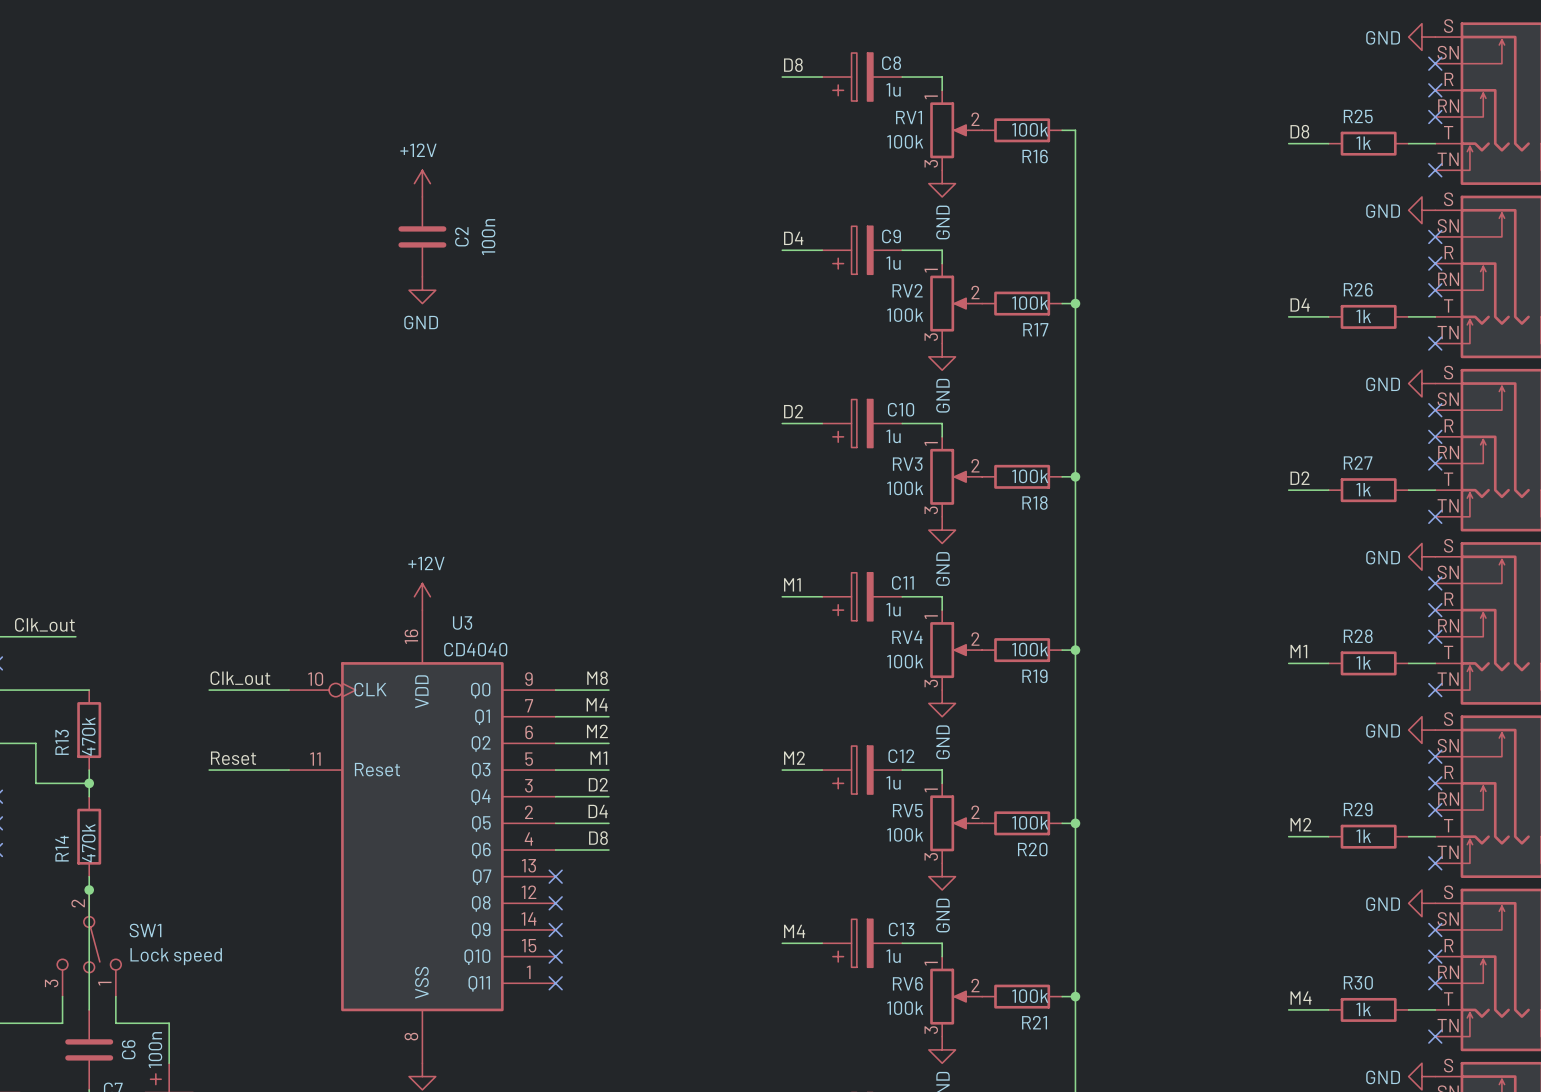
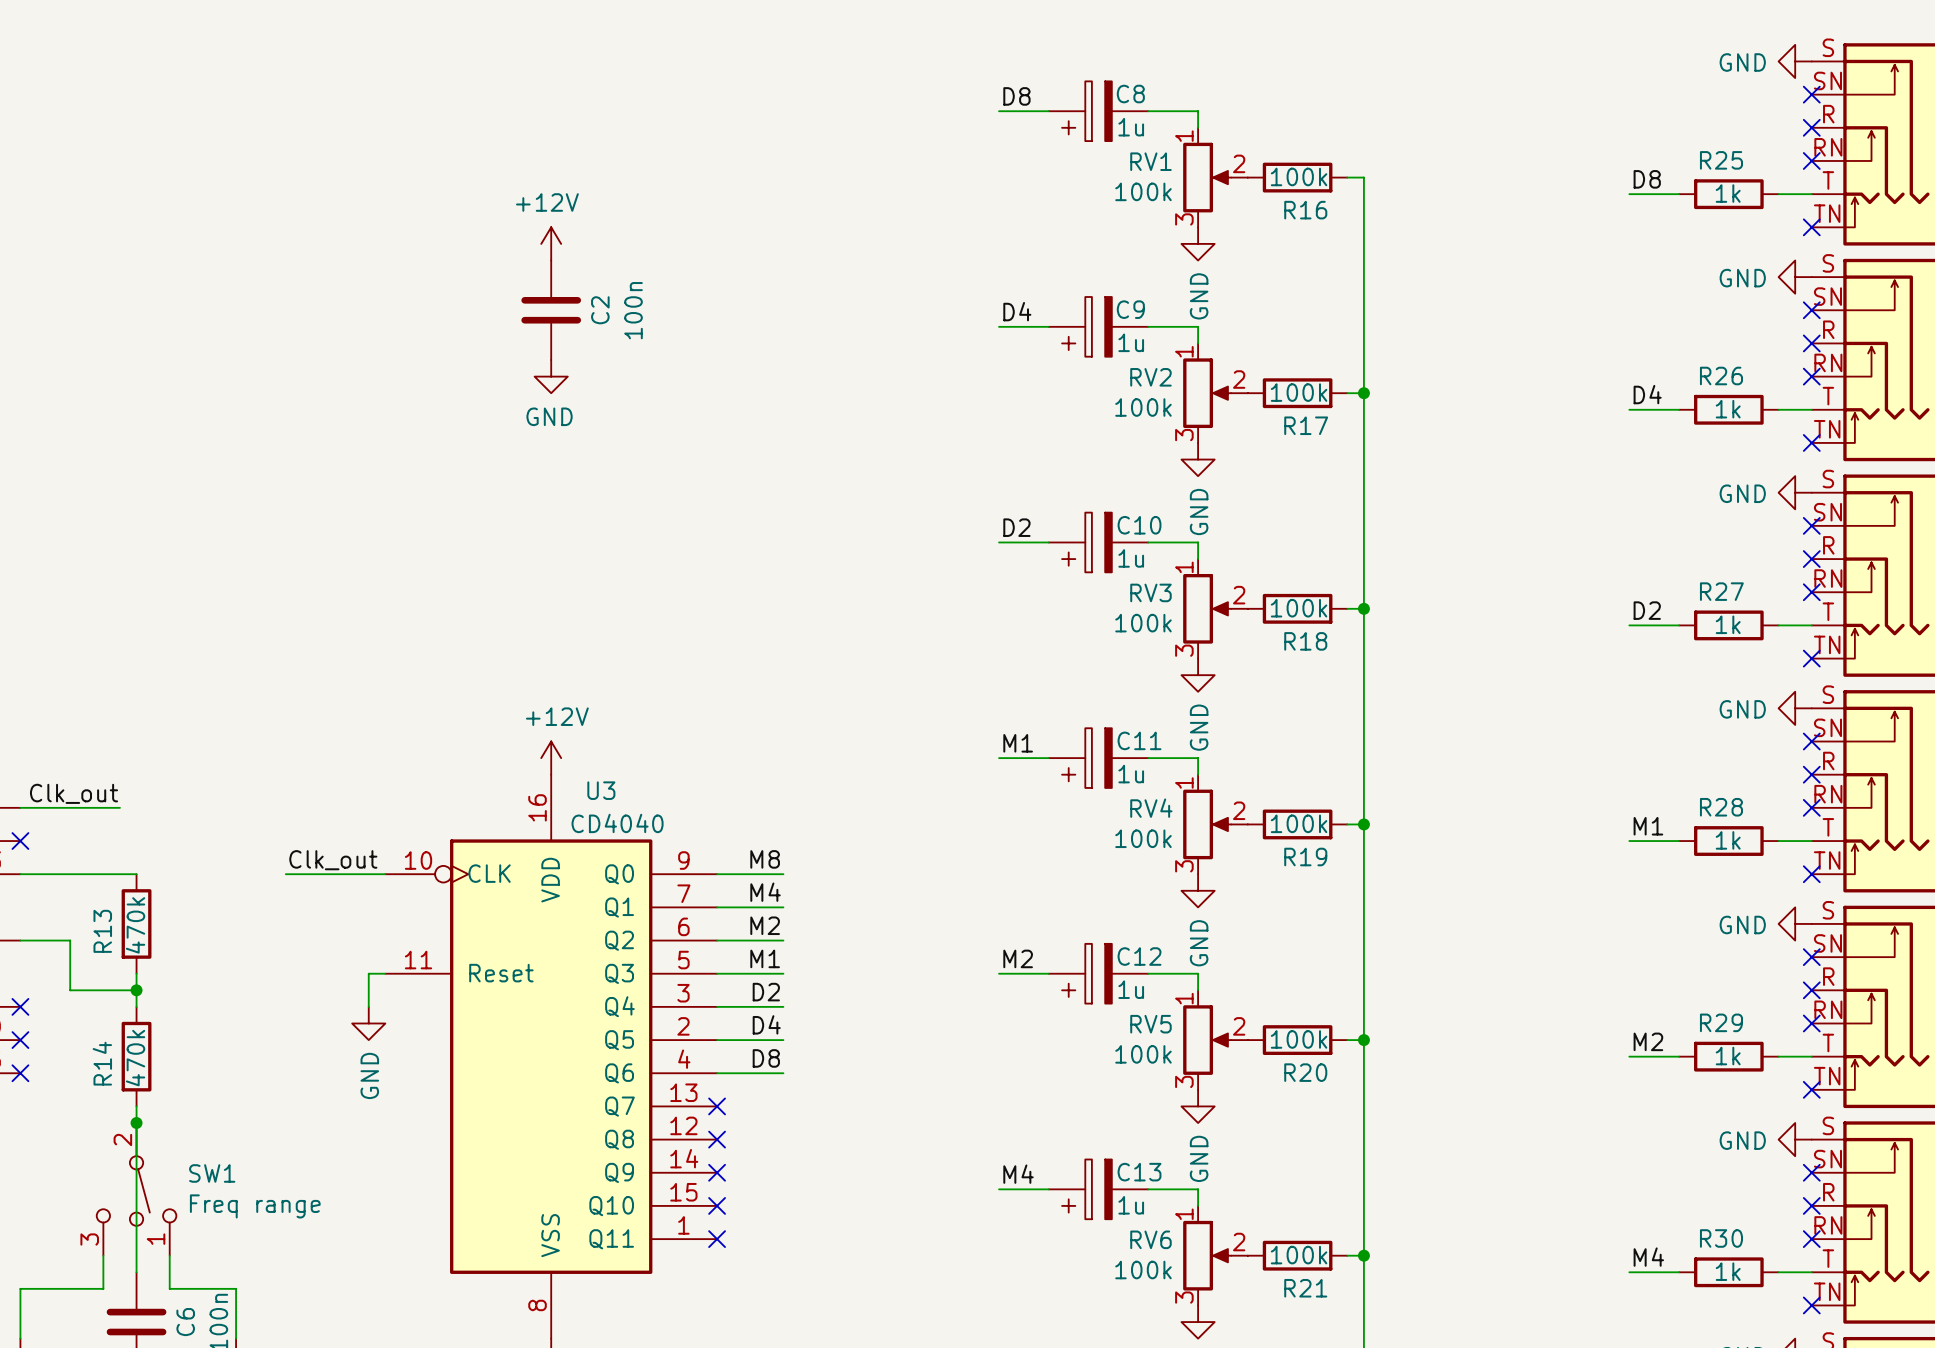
label: Reset (233, 758) -> none
wire: (209, 770) (275, 770) -> (368, 1006) (368, 973)
power symbol: none -> GND (368, 1023)
SW1 value: Lock speed (176, 956) -> Freq range (255, 1206)

